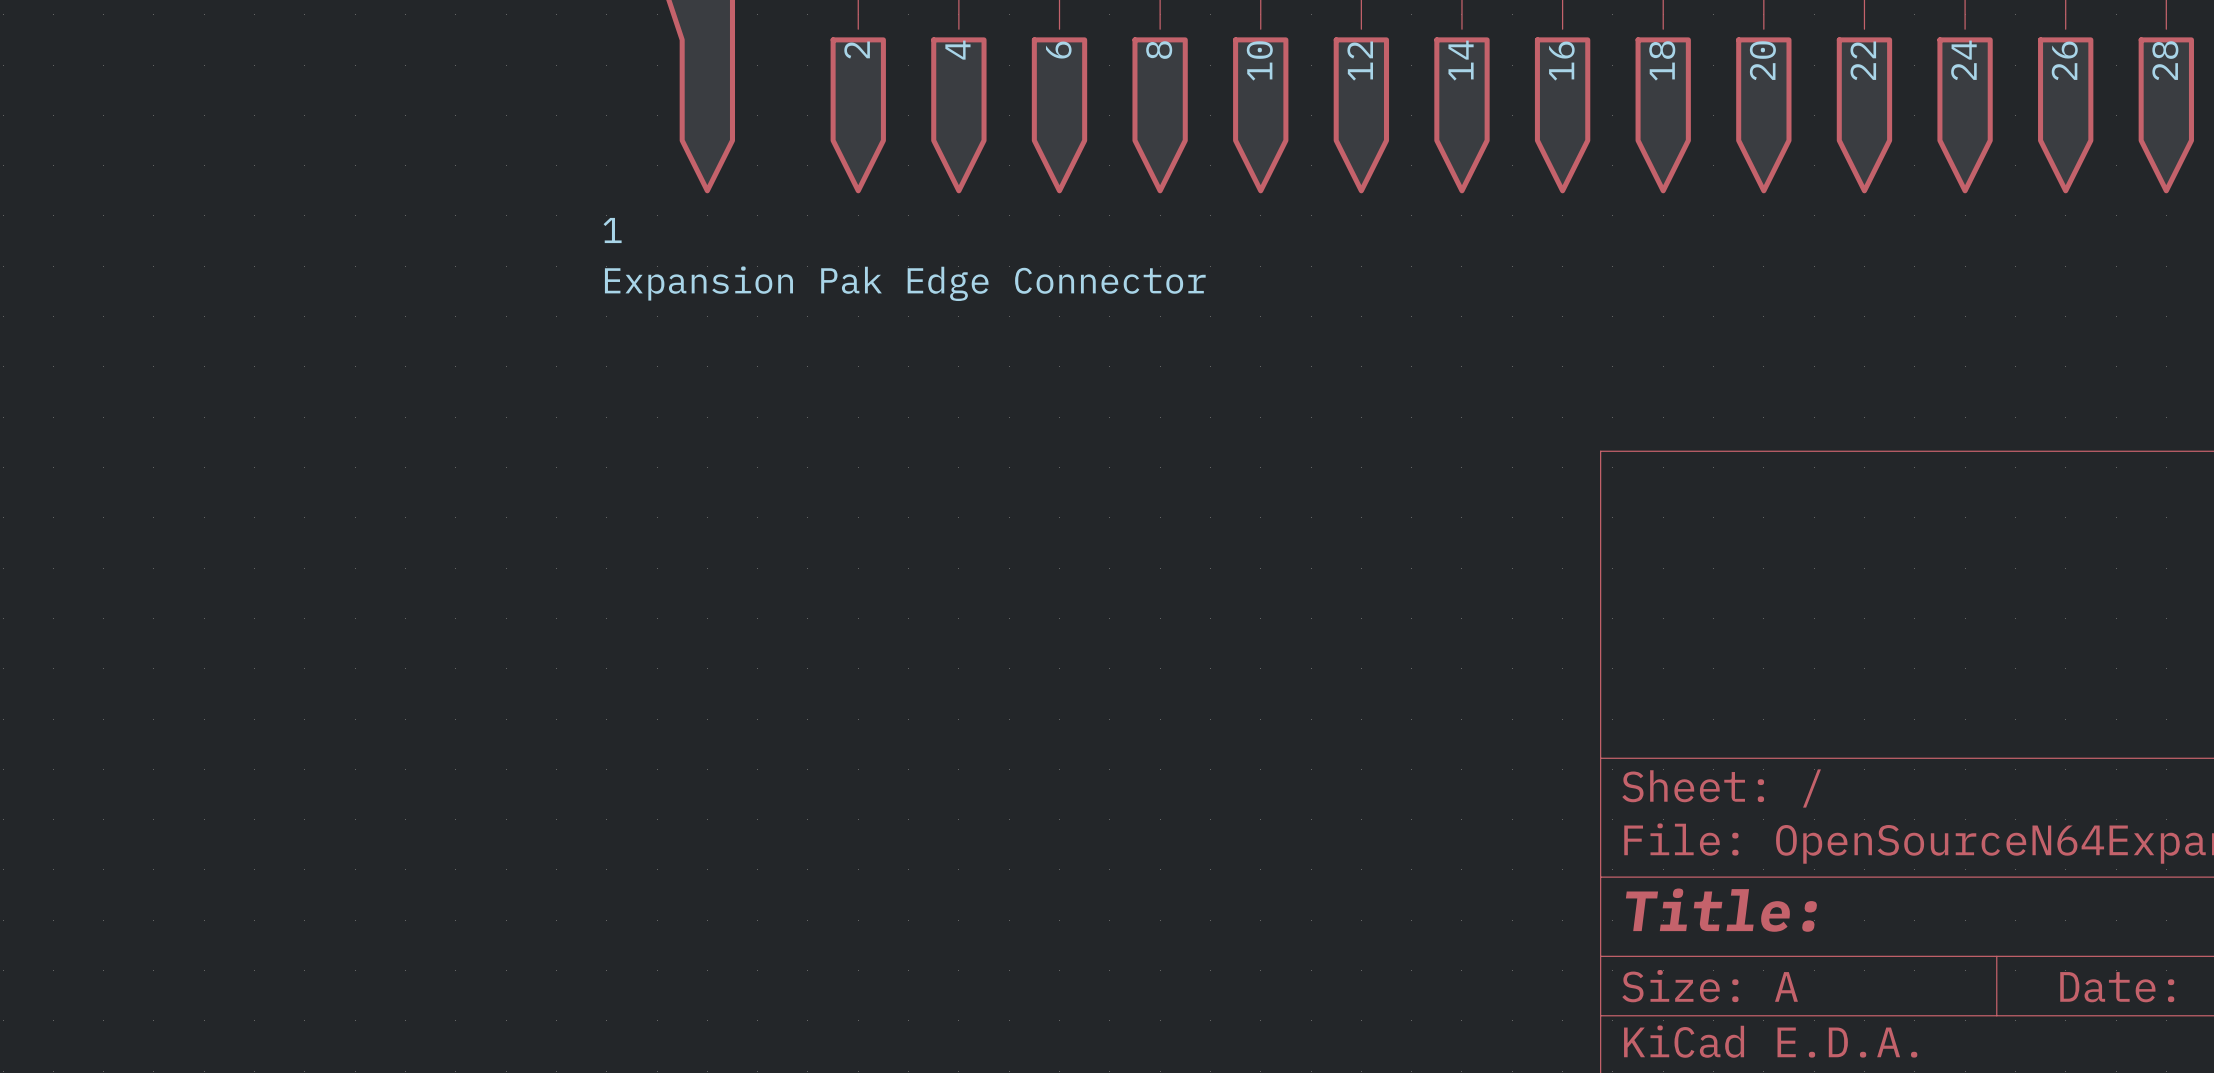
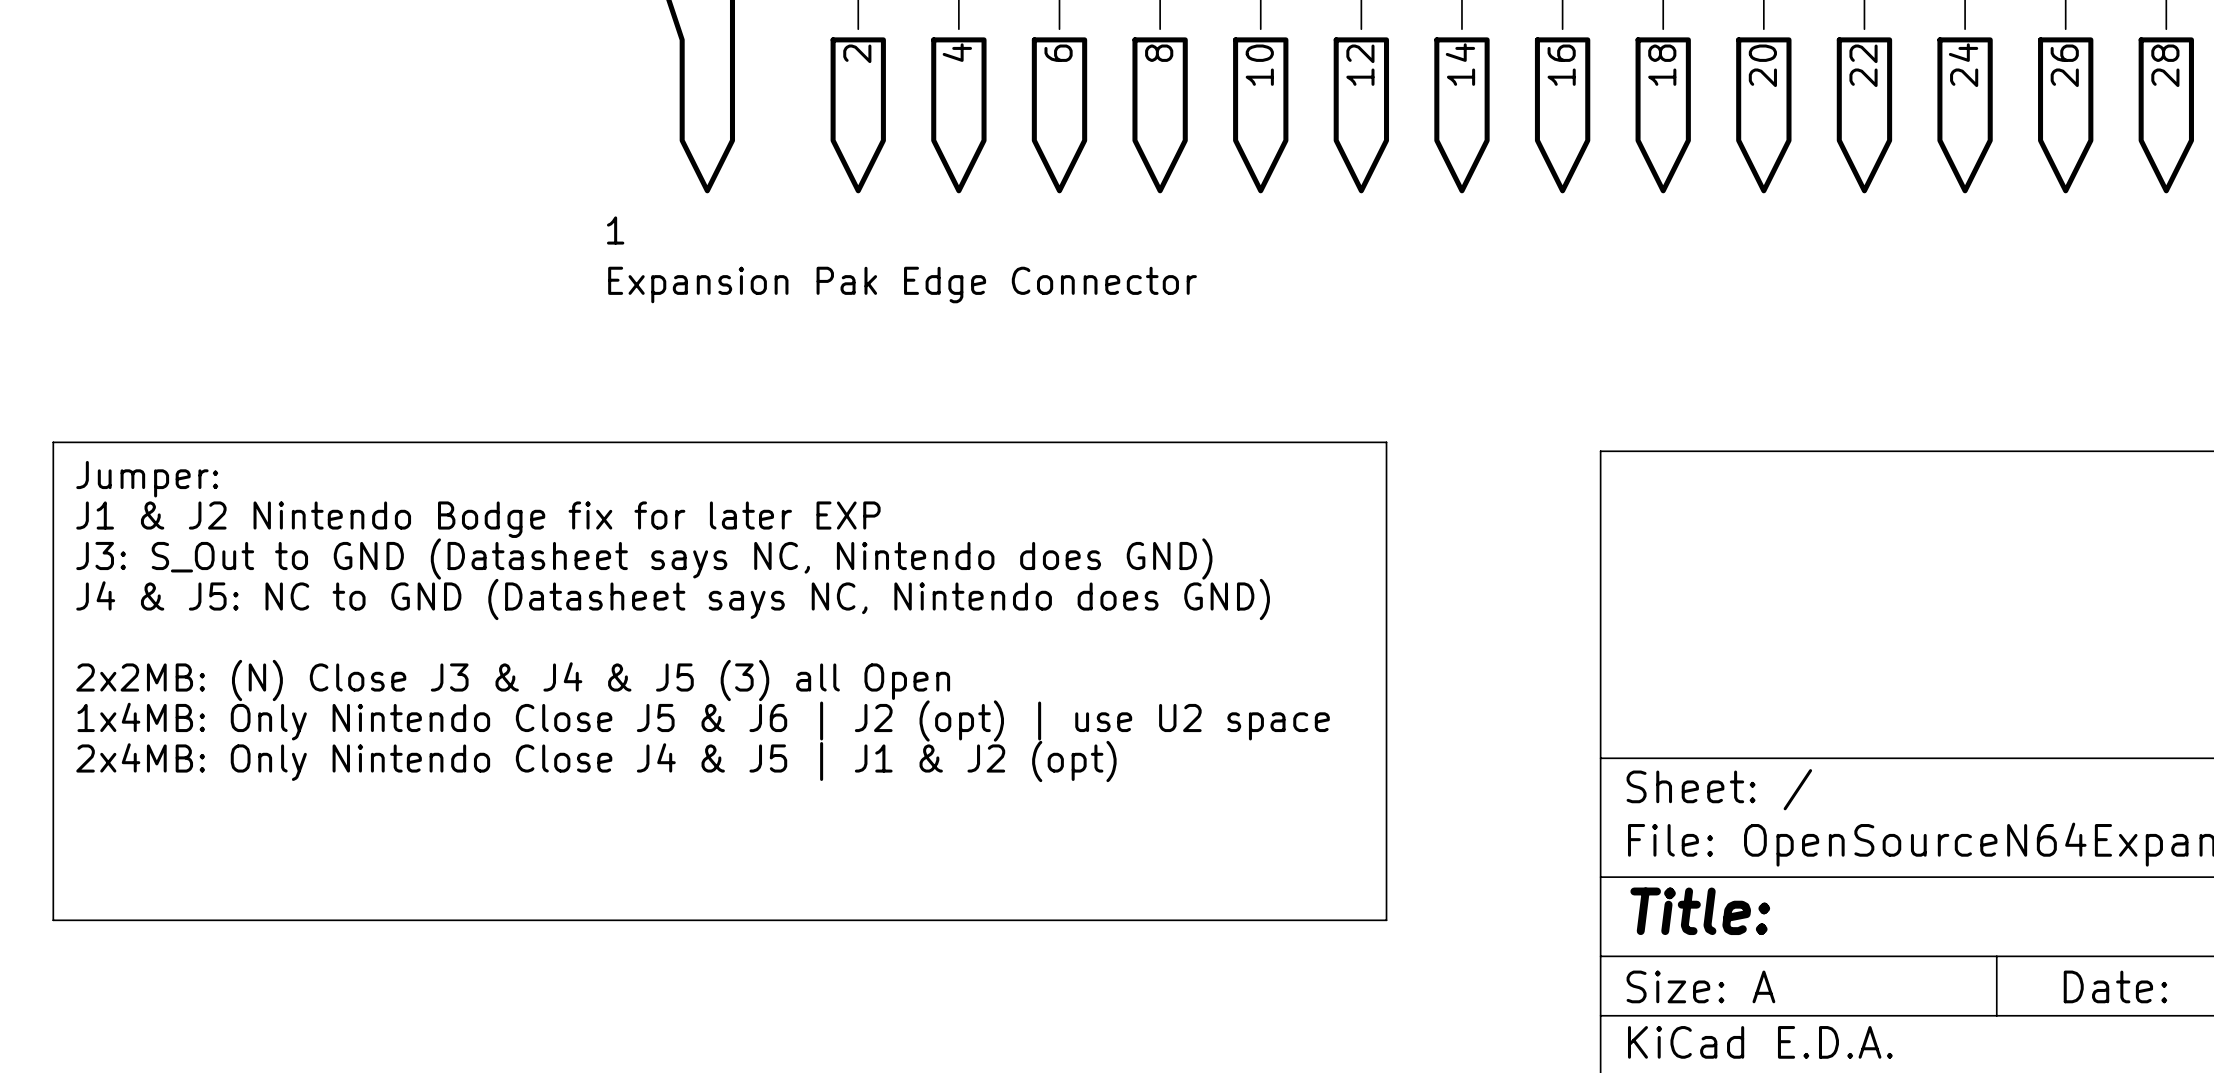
line: none -> (53, 442) (1386, 442) (1386, 920) (53, 920) (53, 442)
text: none -> Jumper: (147, 479)
text: none -> J1 & J2 Nintendo Bodge fix for later EXP (478, 519)
text: none -> J3: S_Out to GND (Datasheet says NC, Nintendo does GND) (644, 558)
text: none -> J4 & J5: NC to GND (Datasheet says NC, Nintendo does GND) (673, 599)
text: none -> 2x2MB: (N) Close J3 & J4 & J5 (3) all Open (513, 680)
text: none -> 1x4MB: Only Nintendo Close J5 & J6 | J2 (opt) | use U2 space (703, 720)
text: none -> 2x4MB: Only Nintendo Close J4 & J5 | J1 & J2 (opt) (596, 761)

